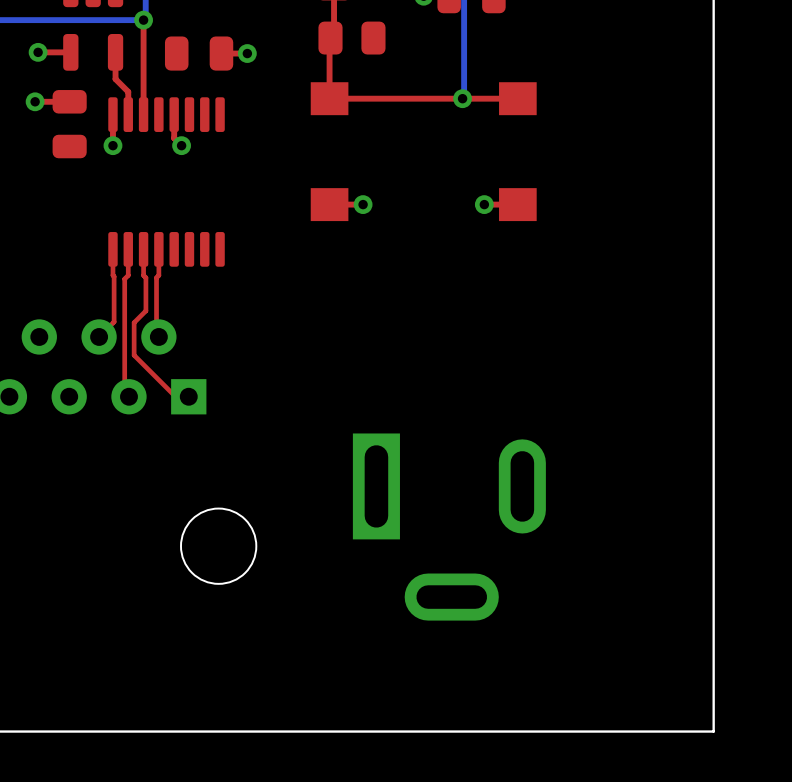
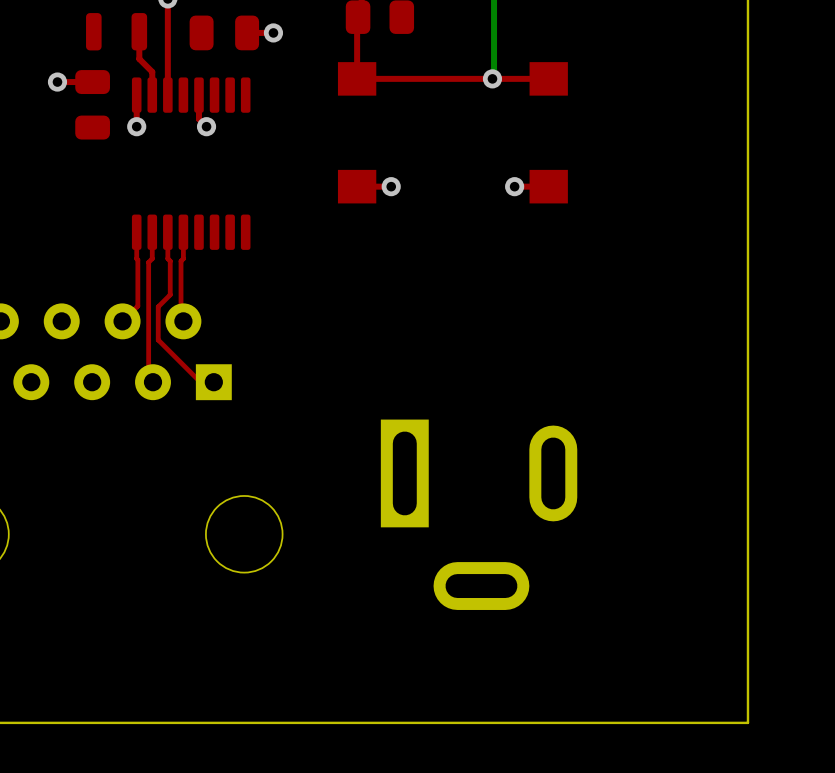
via: (38, 52) -> none
top track: (70, 52) (38, 52) -> none

